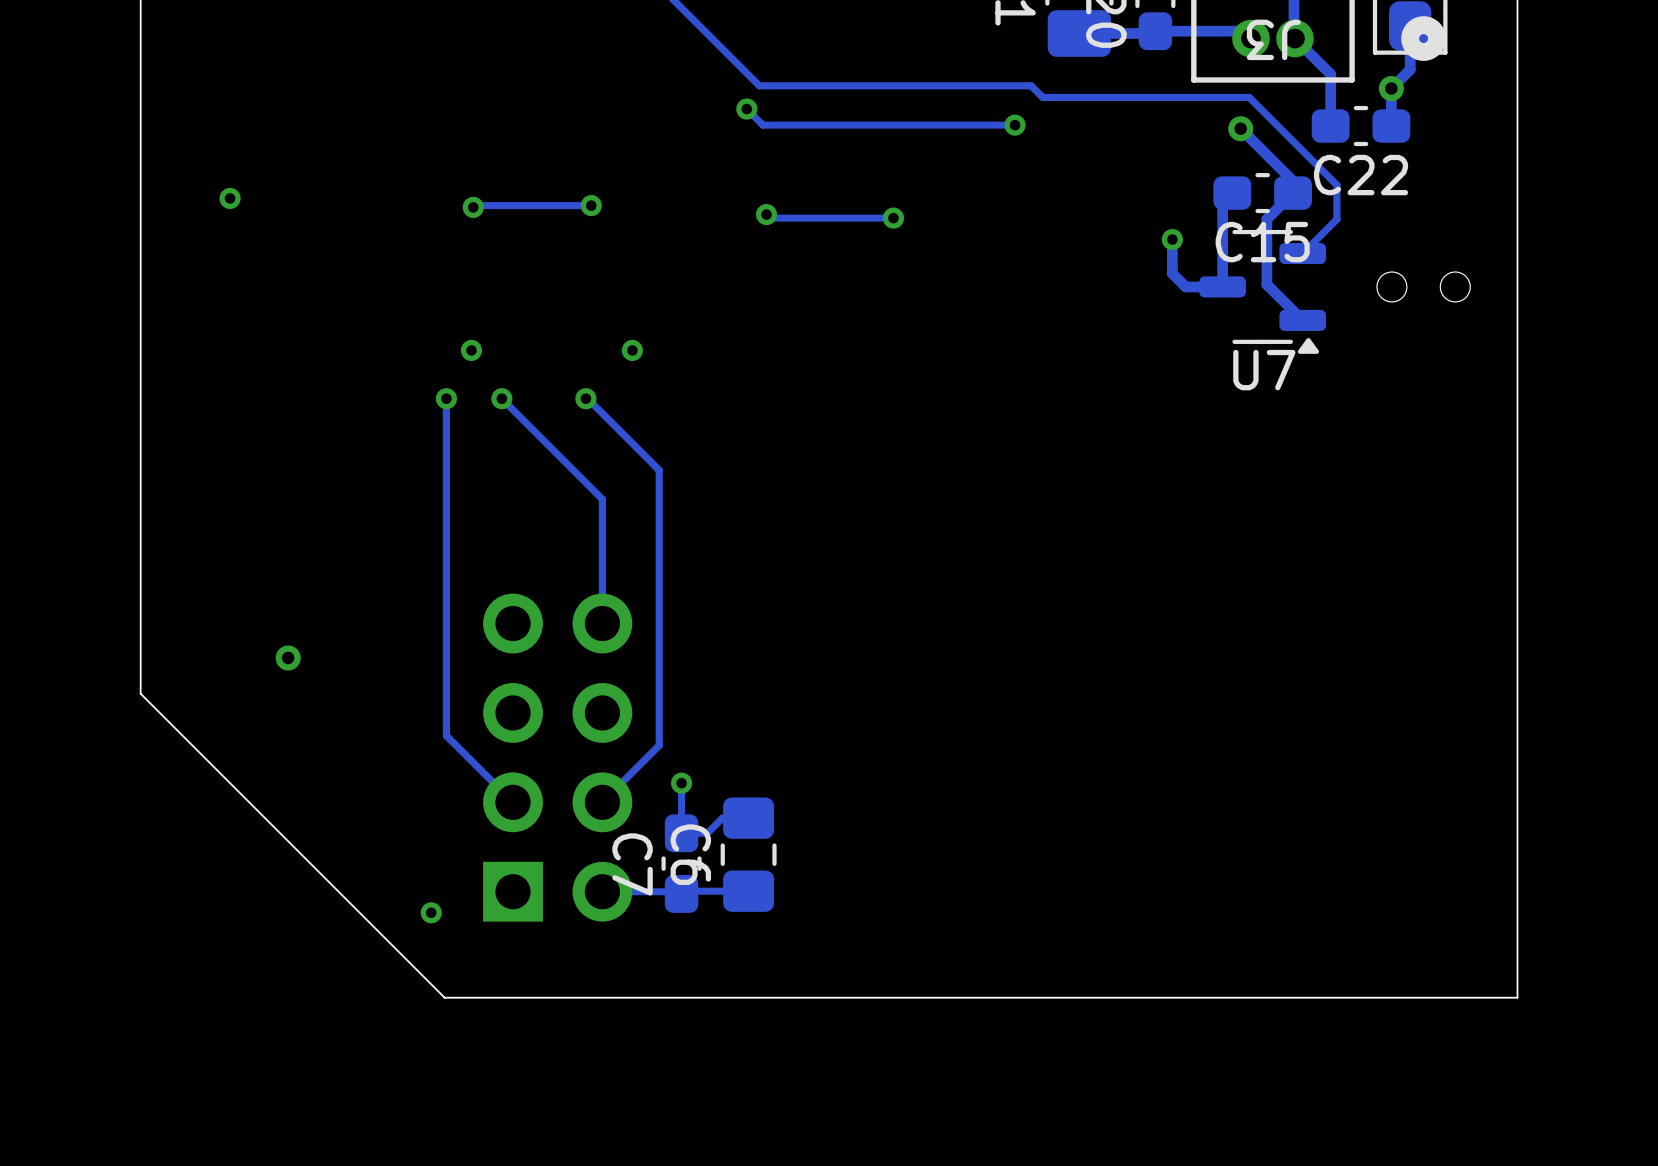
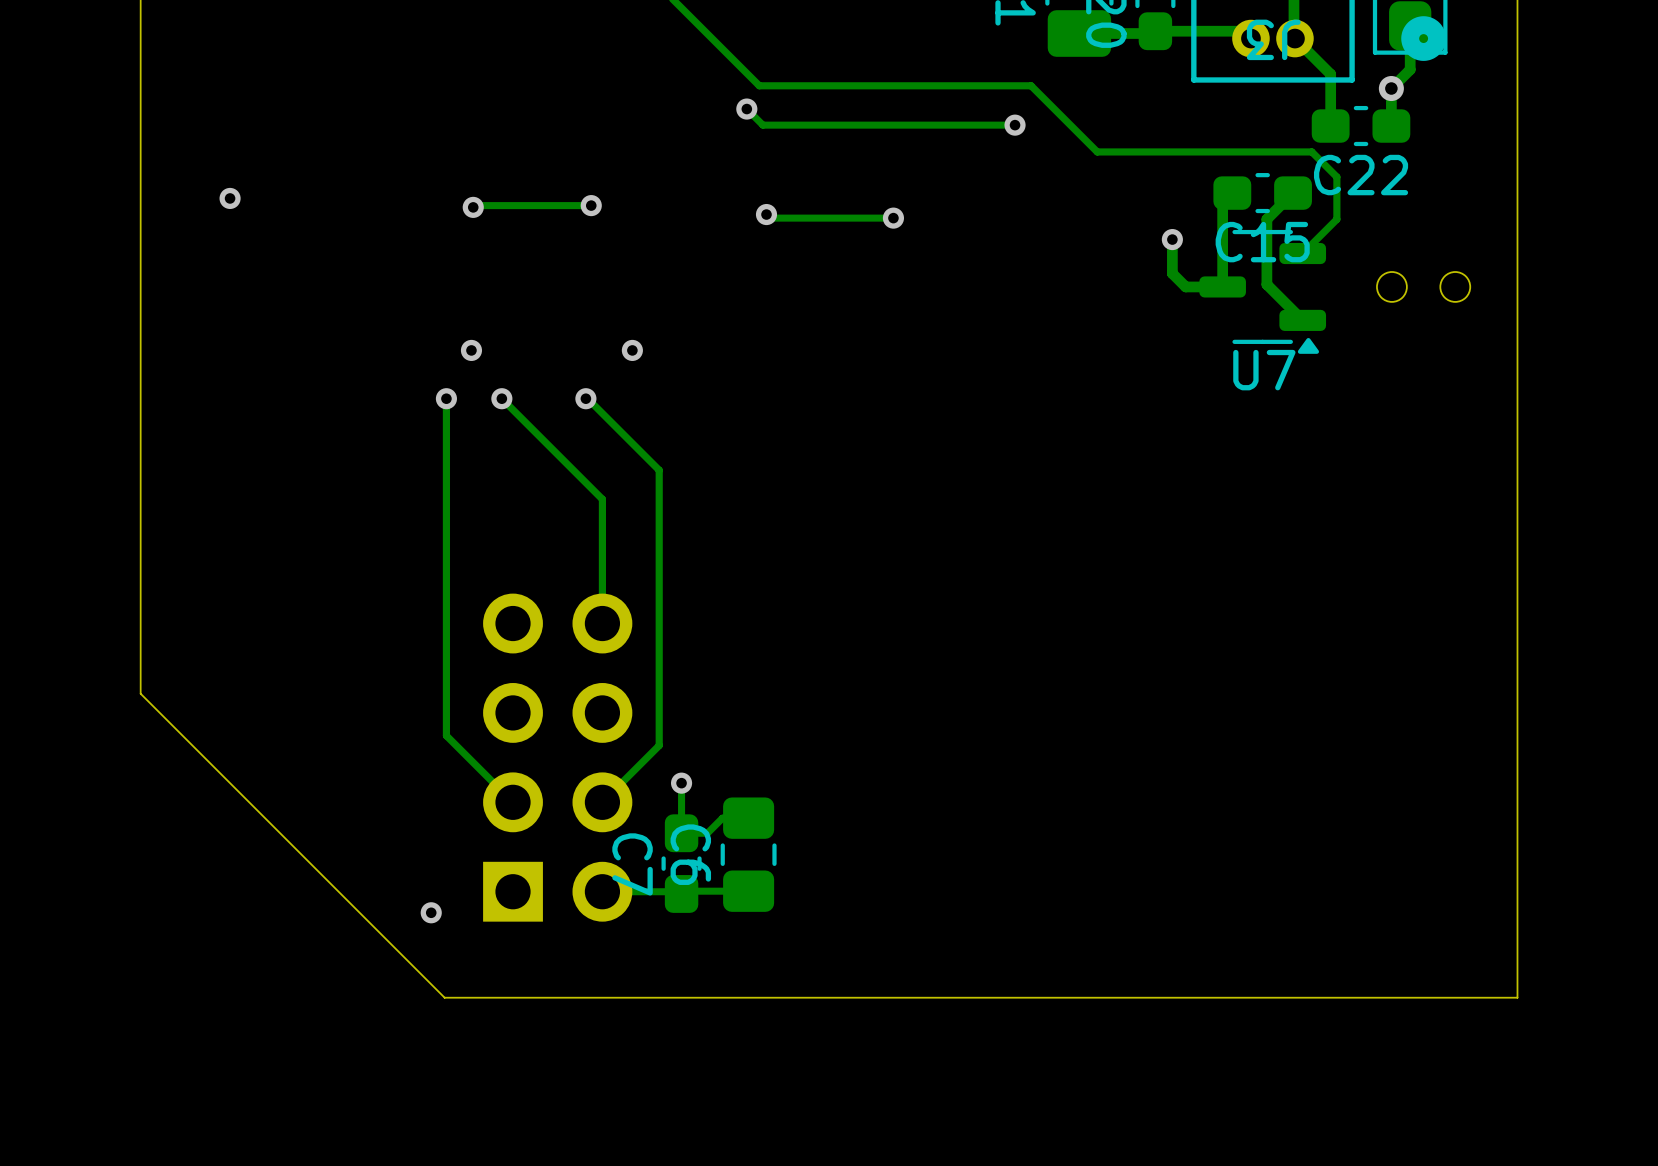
track: (1042, 97) (1249, 97) (1336, 185) -> (1042, 97) (1097, 151) (1311, 151) (1336, 176) (1336, 185)
track: (1240, 128) (1293, 181) (1293, 193) -> none
via: (1240, 128) -> none
via: (288, 657) -> none

